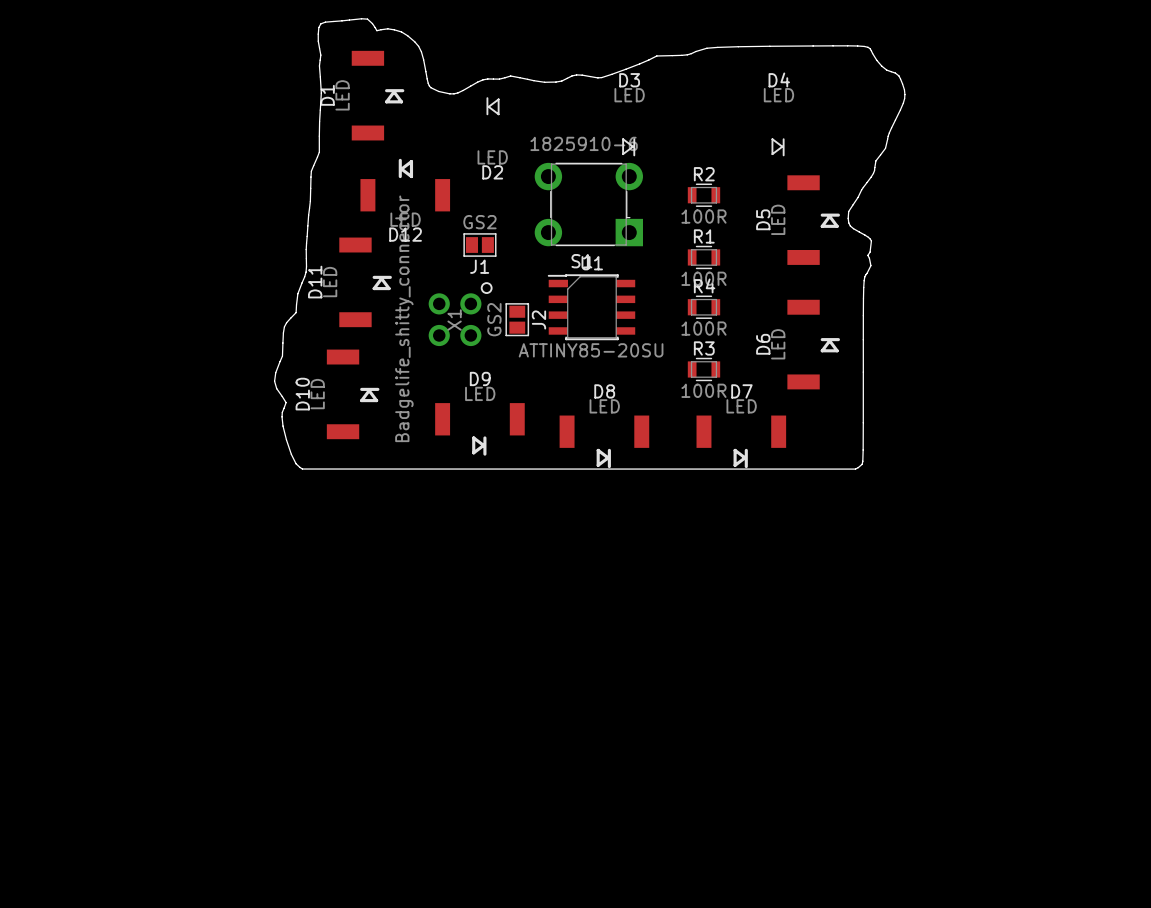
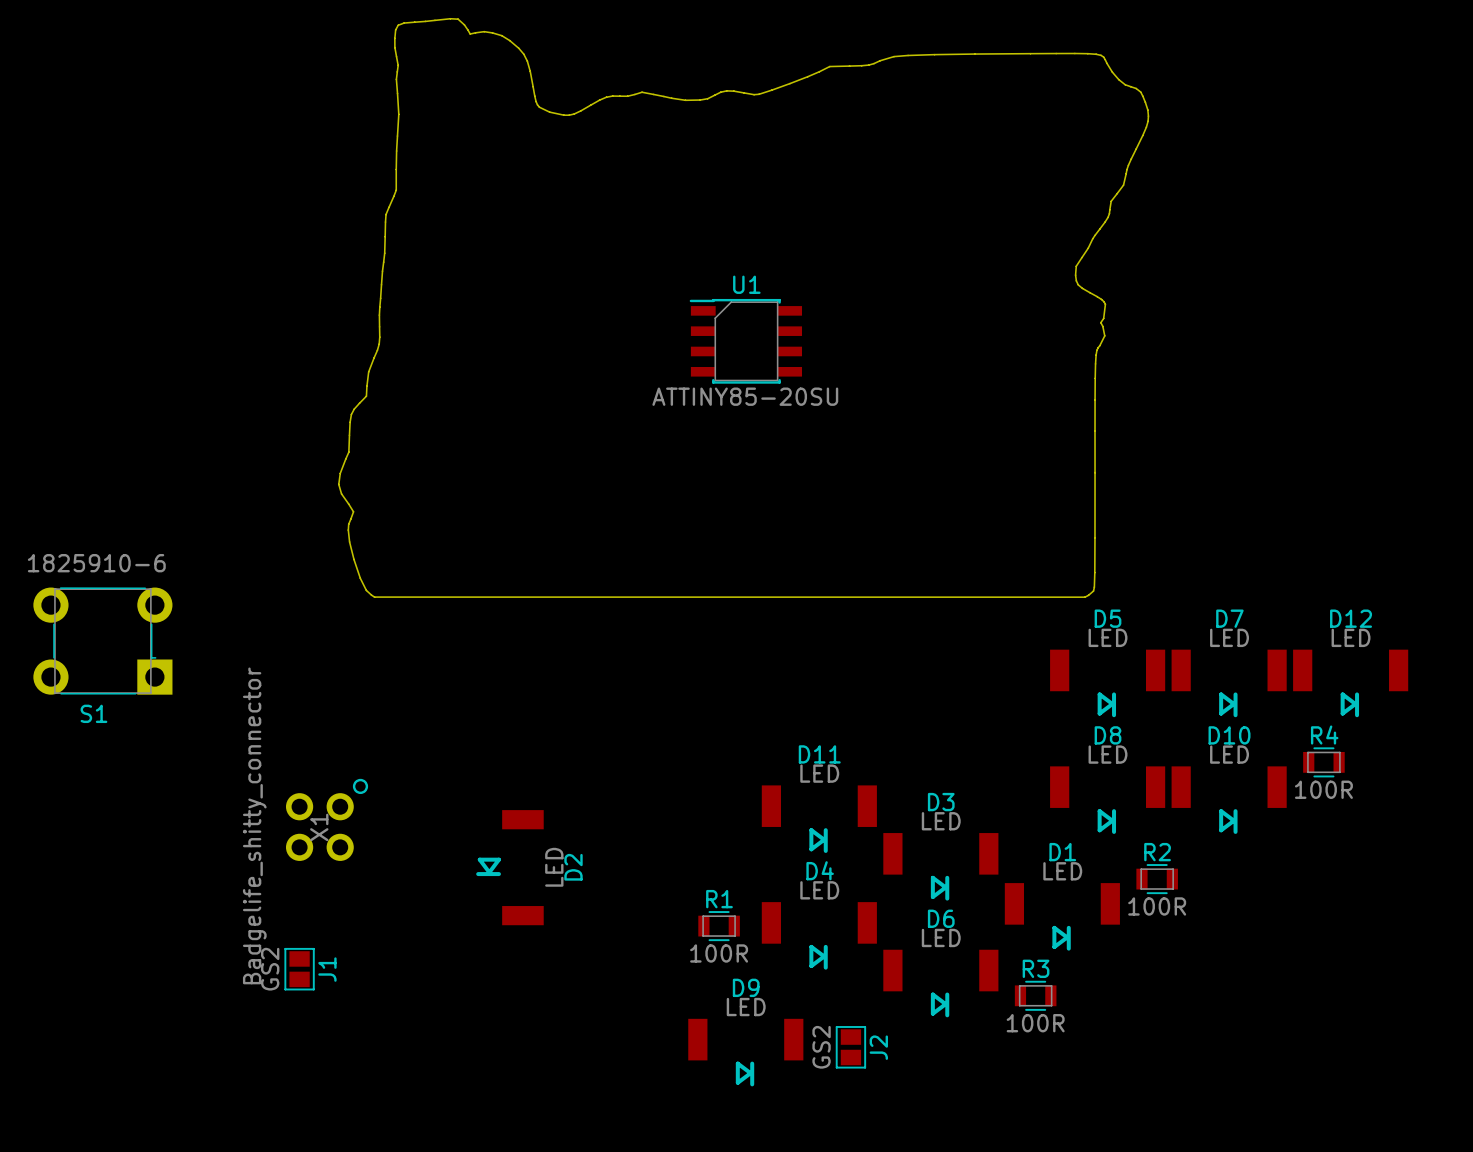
D1 rotation: 0° (378, 95) -> 90° clockwise (1062, 916)
D1 position: (378, 95) -> (1062, 916)
D2 footprint: [486, 97, 500, 116] -> [476, 810, 544, 926]
D3 footprint: [622, 138, 636, 157] -> [883, 833, 999, 901]
D4 footprint: [771, 138, 785, 157] -> [761, 902, 877, 970]
D2 value position: LED (492, 157) -> LED (554, 867)
D2 name position: D2 (492, 172) -> D2 (573, 867)
D12 rotation: 0° (405, 185) -> 180° (1350, 683)
D12 position: (405, 185) -> (1350, 683)
R2 position: (703, 195) -> (1157, 879)
S1 position: (588, 204) -> (102, 641)
D5 rotation: 0° (813, 220) -> 90° clockwise (1107, 683)
D5 position: (813, 220) -> (1107, 683)
J1 value position: GS2 (479, 222) -> GS2 (270, 969)
J1 rotation: 0° (479, 245) -> 90° clockwise (299, 969)
J1 position: (479, 245) -> (299, 969)
R1 position: (703, 257) -> (719, 926)
J1 name position: J1 (479, 266) -> J1 (327, 969)
D11 rotation: 0° (365, 282) -> 90° clockwise (819, 819)
D11 position: (365, 282) -> (819, 819)
U1 position: (591, 307) -> (745, 341)
R4 position: (703, 307) -> (1323, 762)
X1 position: (460, 314) -> (327, 819)
J2 position: (517, 319) -> (850, 1047)
D6 rotation: 0° (813, 344) -> 90° clockwise (940, 983)
D6 position: (813, 344) -> (940, 983)
R3 position: (703, 369) -> (1035, 995)
D10 rotation: 0° (353, 394) -> 90° clockwise (1229, 800)
D10 position: (353, 394) -> (1229, 800)
D9 position: (479, 429) -> (745, 1052)
D8 position: (604, 441) -> (1107, 800)
D7 position: (741, 441) -> (1229, 683)

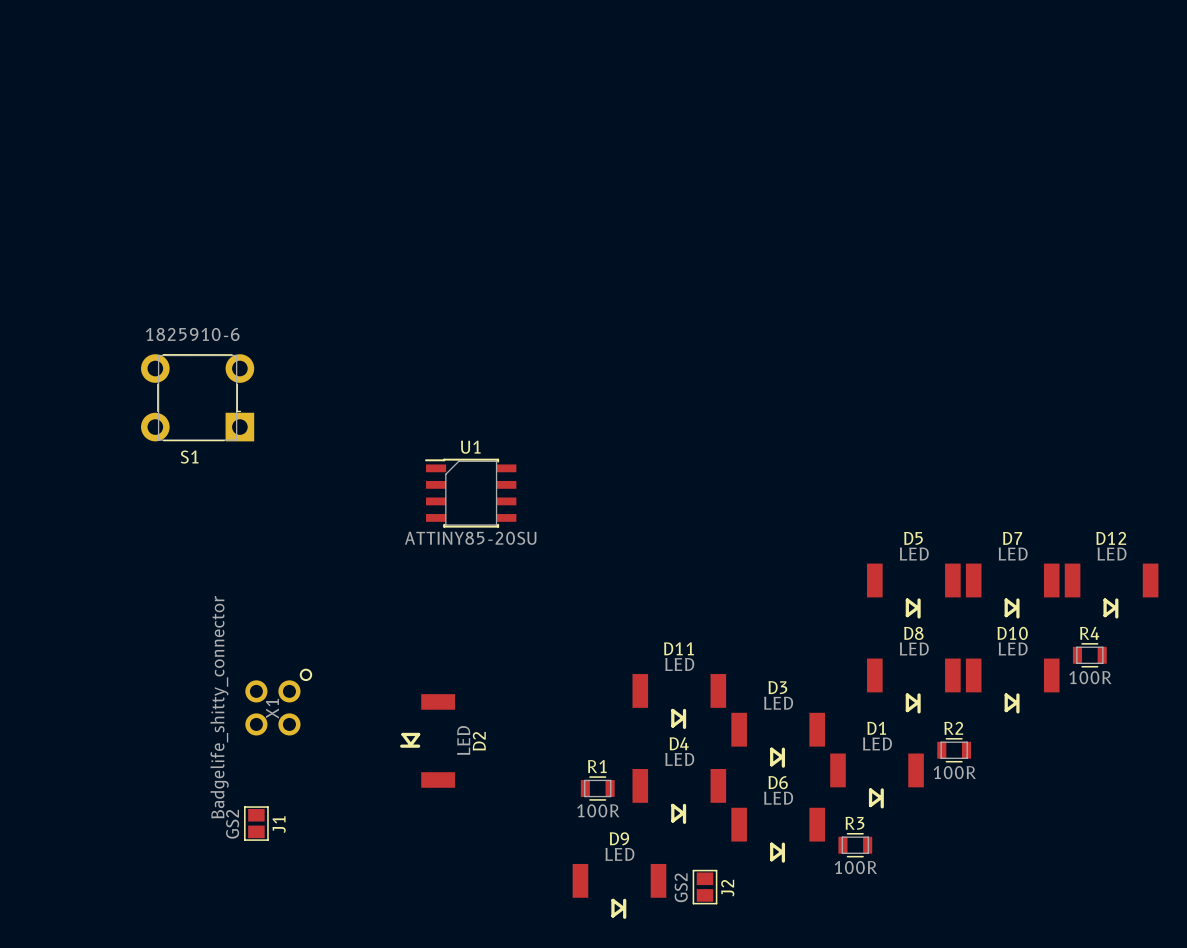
board edge: (450, 18) (458, 19) (470, 34) (484, 31) (492, 32) (509, 40) (518, 48) (527, 61) (537, 104) (549, 112) (563, 115) (574, 113) (606, 97) (627, 96) (642, 92) (685, 100) (707, 98) (726, 90) (759, 94) (829, 66) (868, 65) (894, 56) (1074, 53) (1096, 54) (1103, 57) (1118, 79) (1140, 92) (1148, 116) (1146, 127) (1128, 165) (1123, 185) (1111, 201) (1108, 217) (1076, 266) (1075, 275) (1078, 284) (1101, 299) (1105, 304) (1103, 318) (1100, 322) (1104, 335) (1096, 350) (1095, 363) (1093, 591) (1085, 597) (374, 597) (371, 595) (366, 590) (360, 578) (353, 559) (348, 530) (353, 511) (341, 493) (338, 484) (340, 473) (348, 452) (351, 414) (366, 396) (368, 371) (379, 344) (386, 214) (396, 190) (398, 114) (395, 29) (398, 25) (404, 23) (450, 18) -> none
U1 position: (745, 341) -> (470, 493)
S1 position: (102, 641) -> (197, 397)

